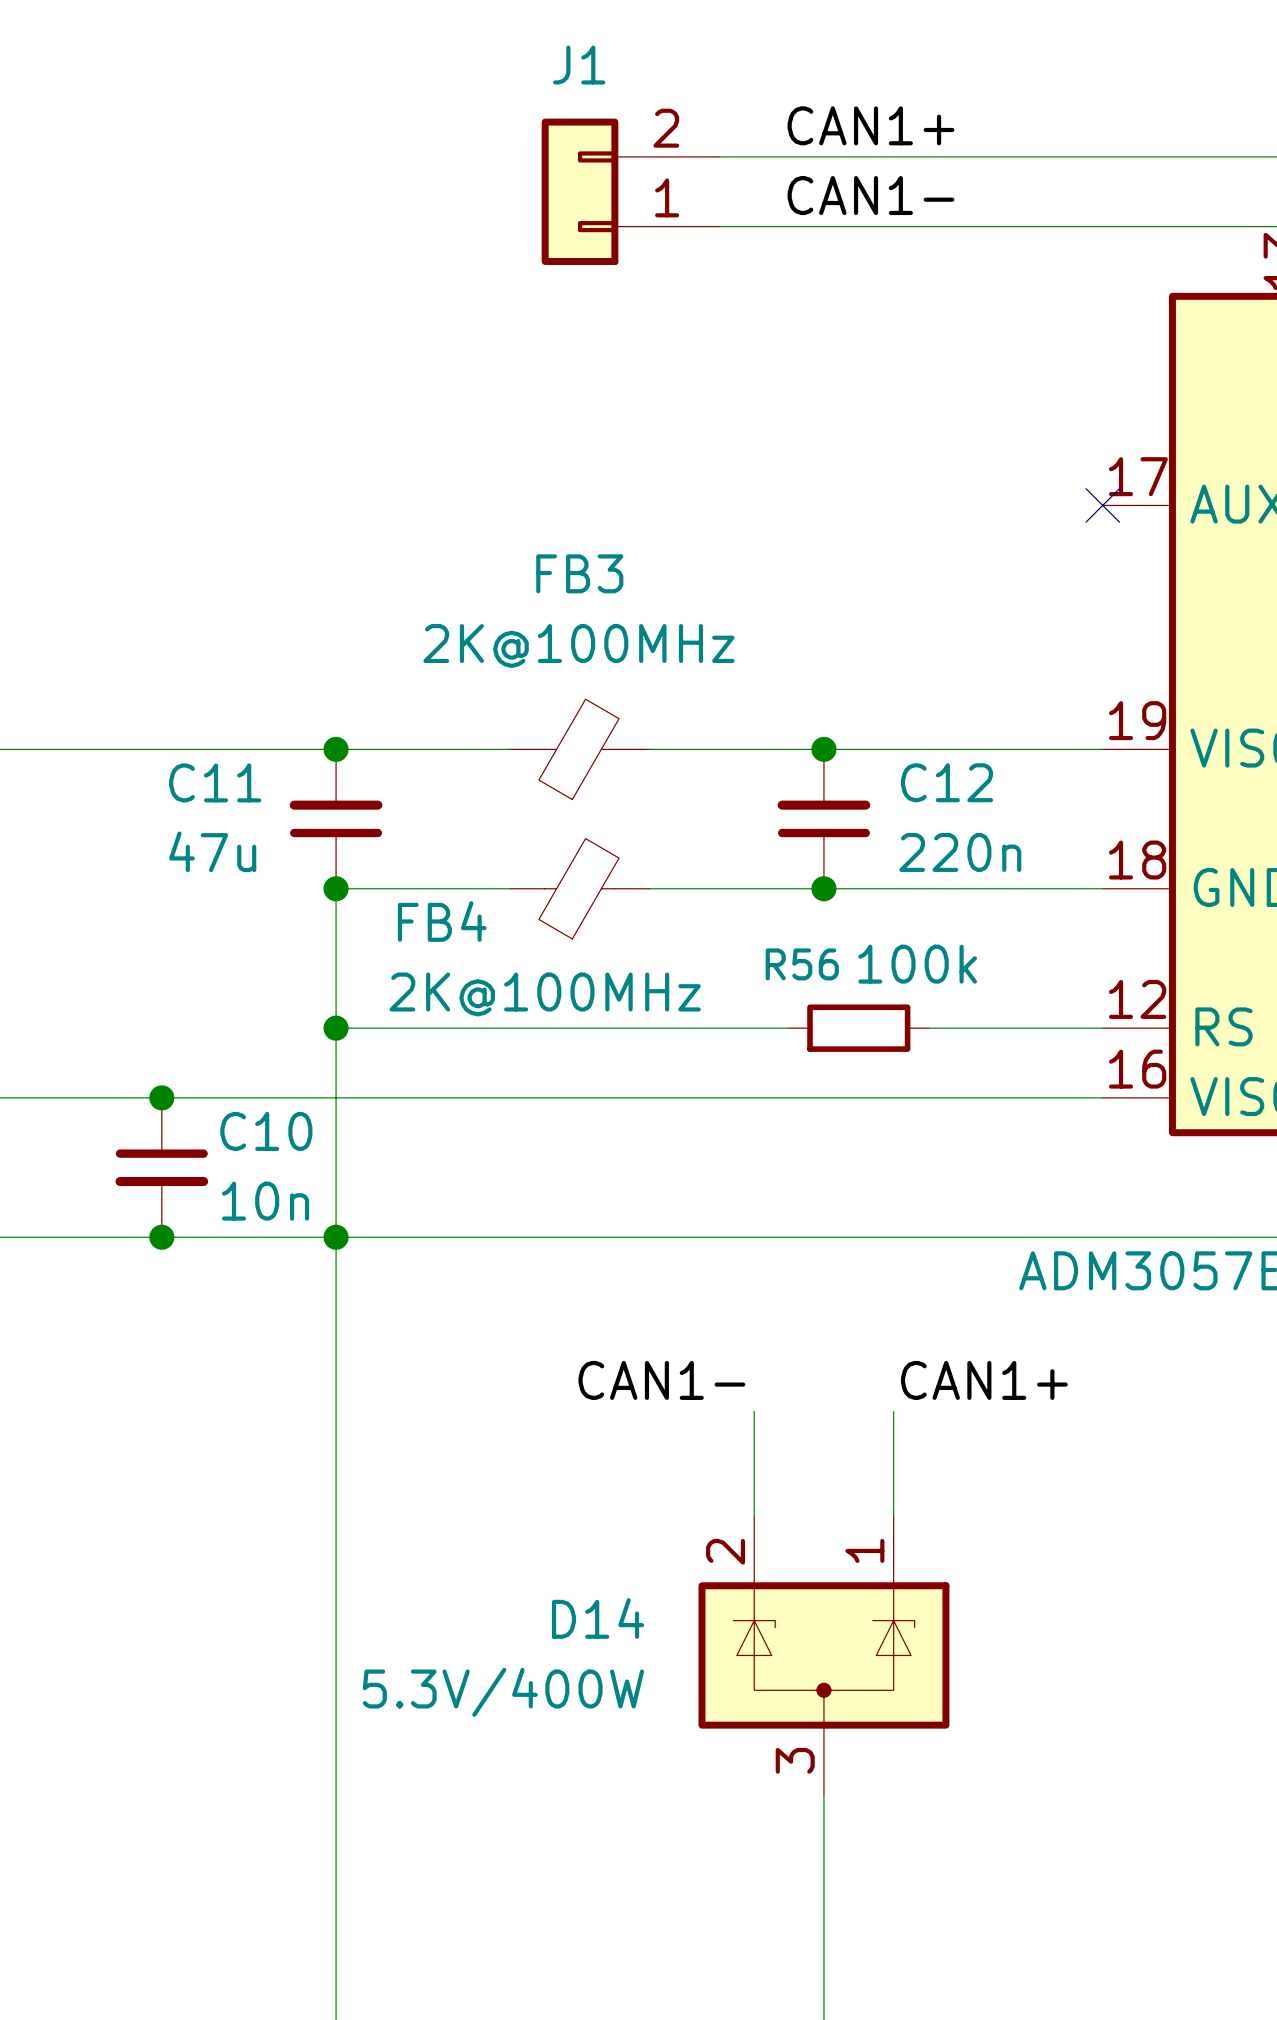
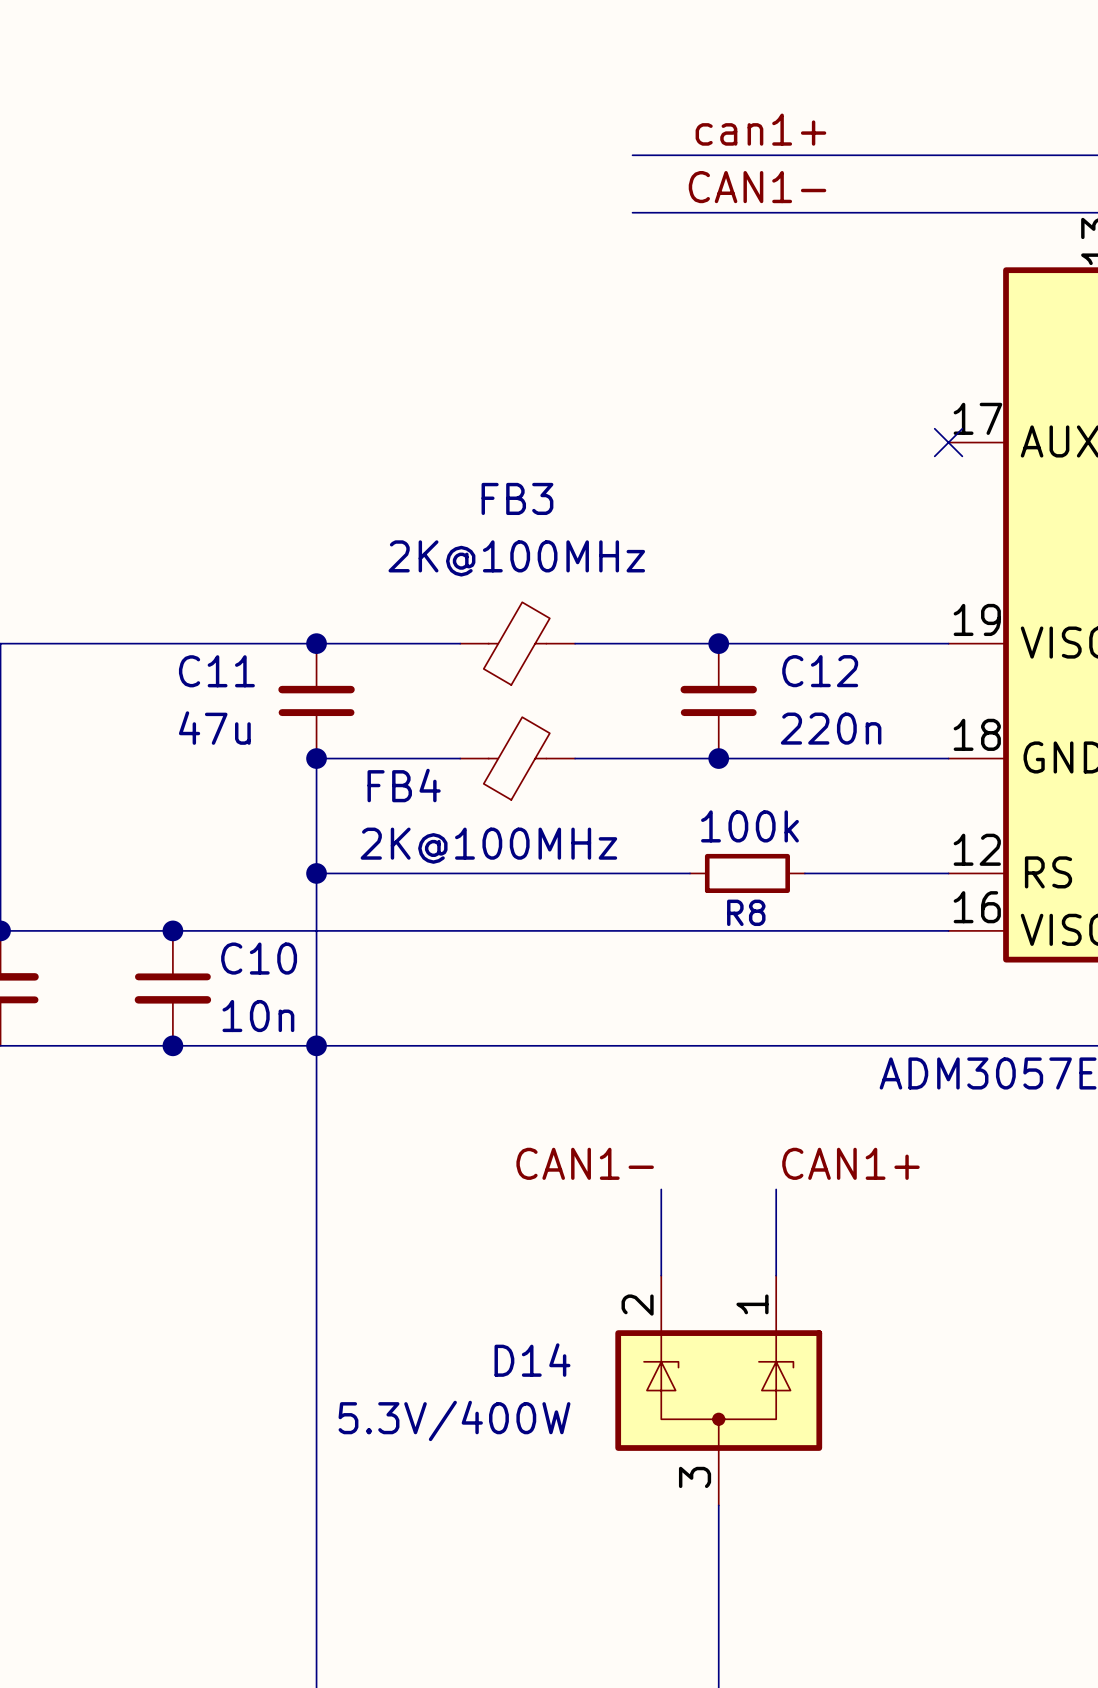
label: CAN1+ (870, 125) -> can1+ (760, 129)
J1: (630, 191) -> none
R56 name: R56 (802, 964) -> R8 (746, 912)
R56 value position: 100k (917, 964) -> 100k (749, 826)

